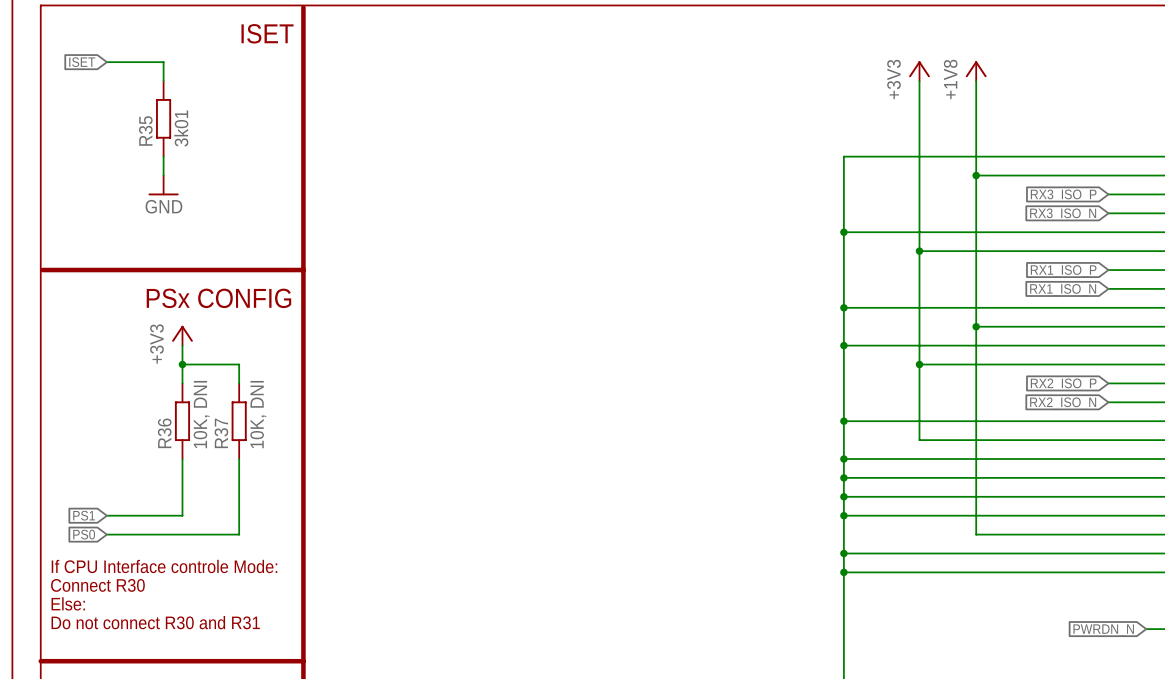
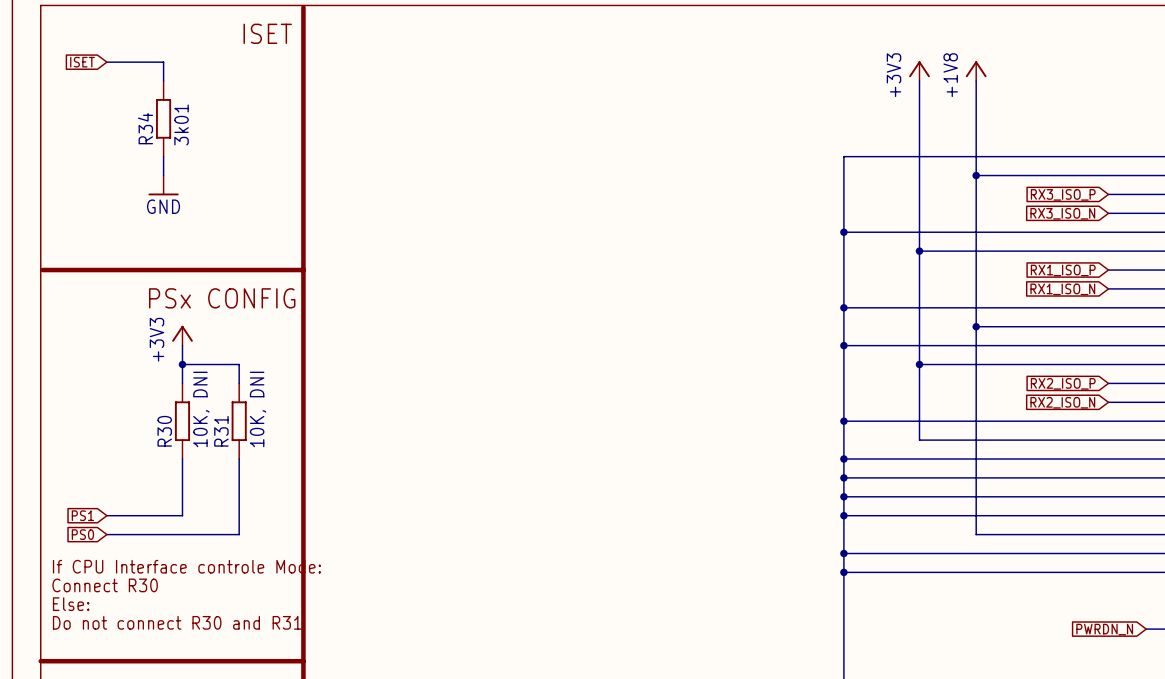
R35 name: R35 (145, 130) -> R34 (145, 128)
R36 name: R36 (164, 433) -> R30 (164, 431)
R37 name: R37 (221, 433) -> R31 (221, 431)

